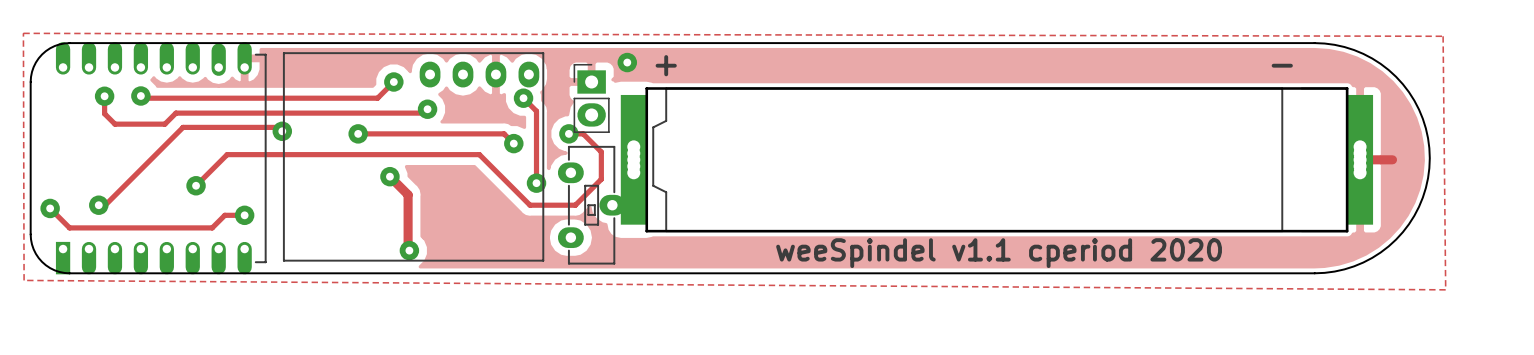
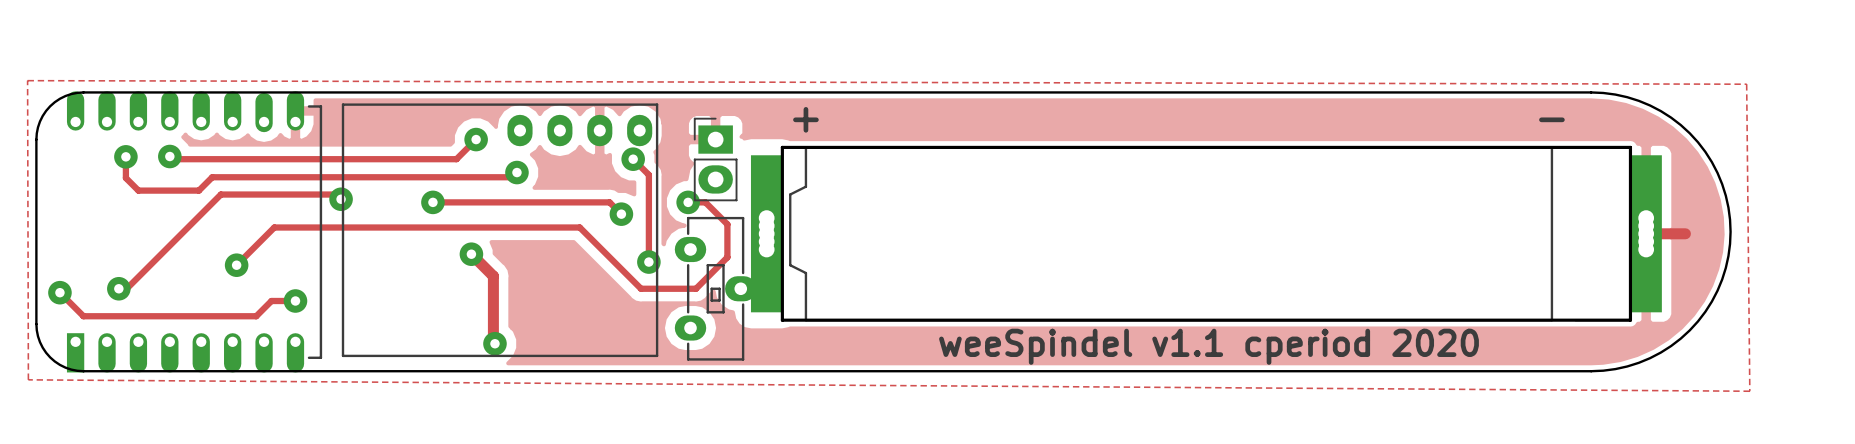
via: (627, 62) -> none

